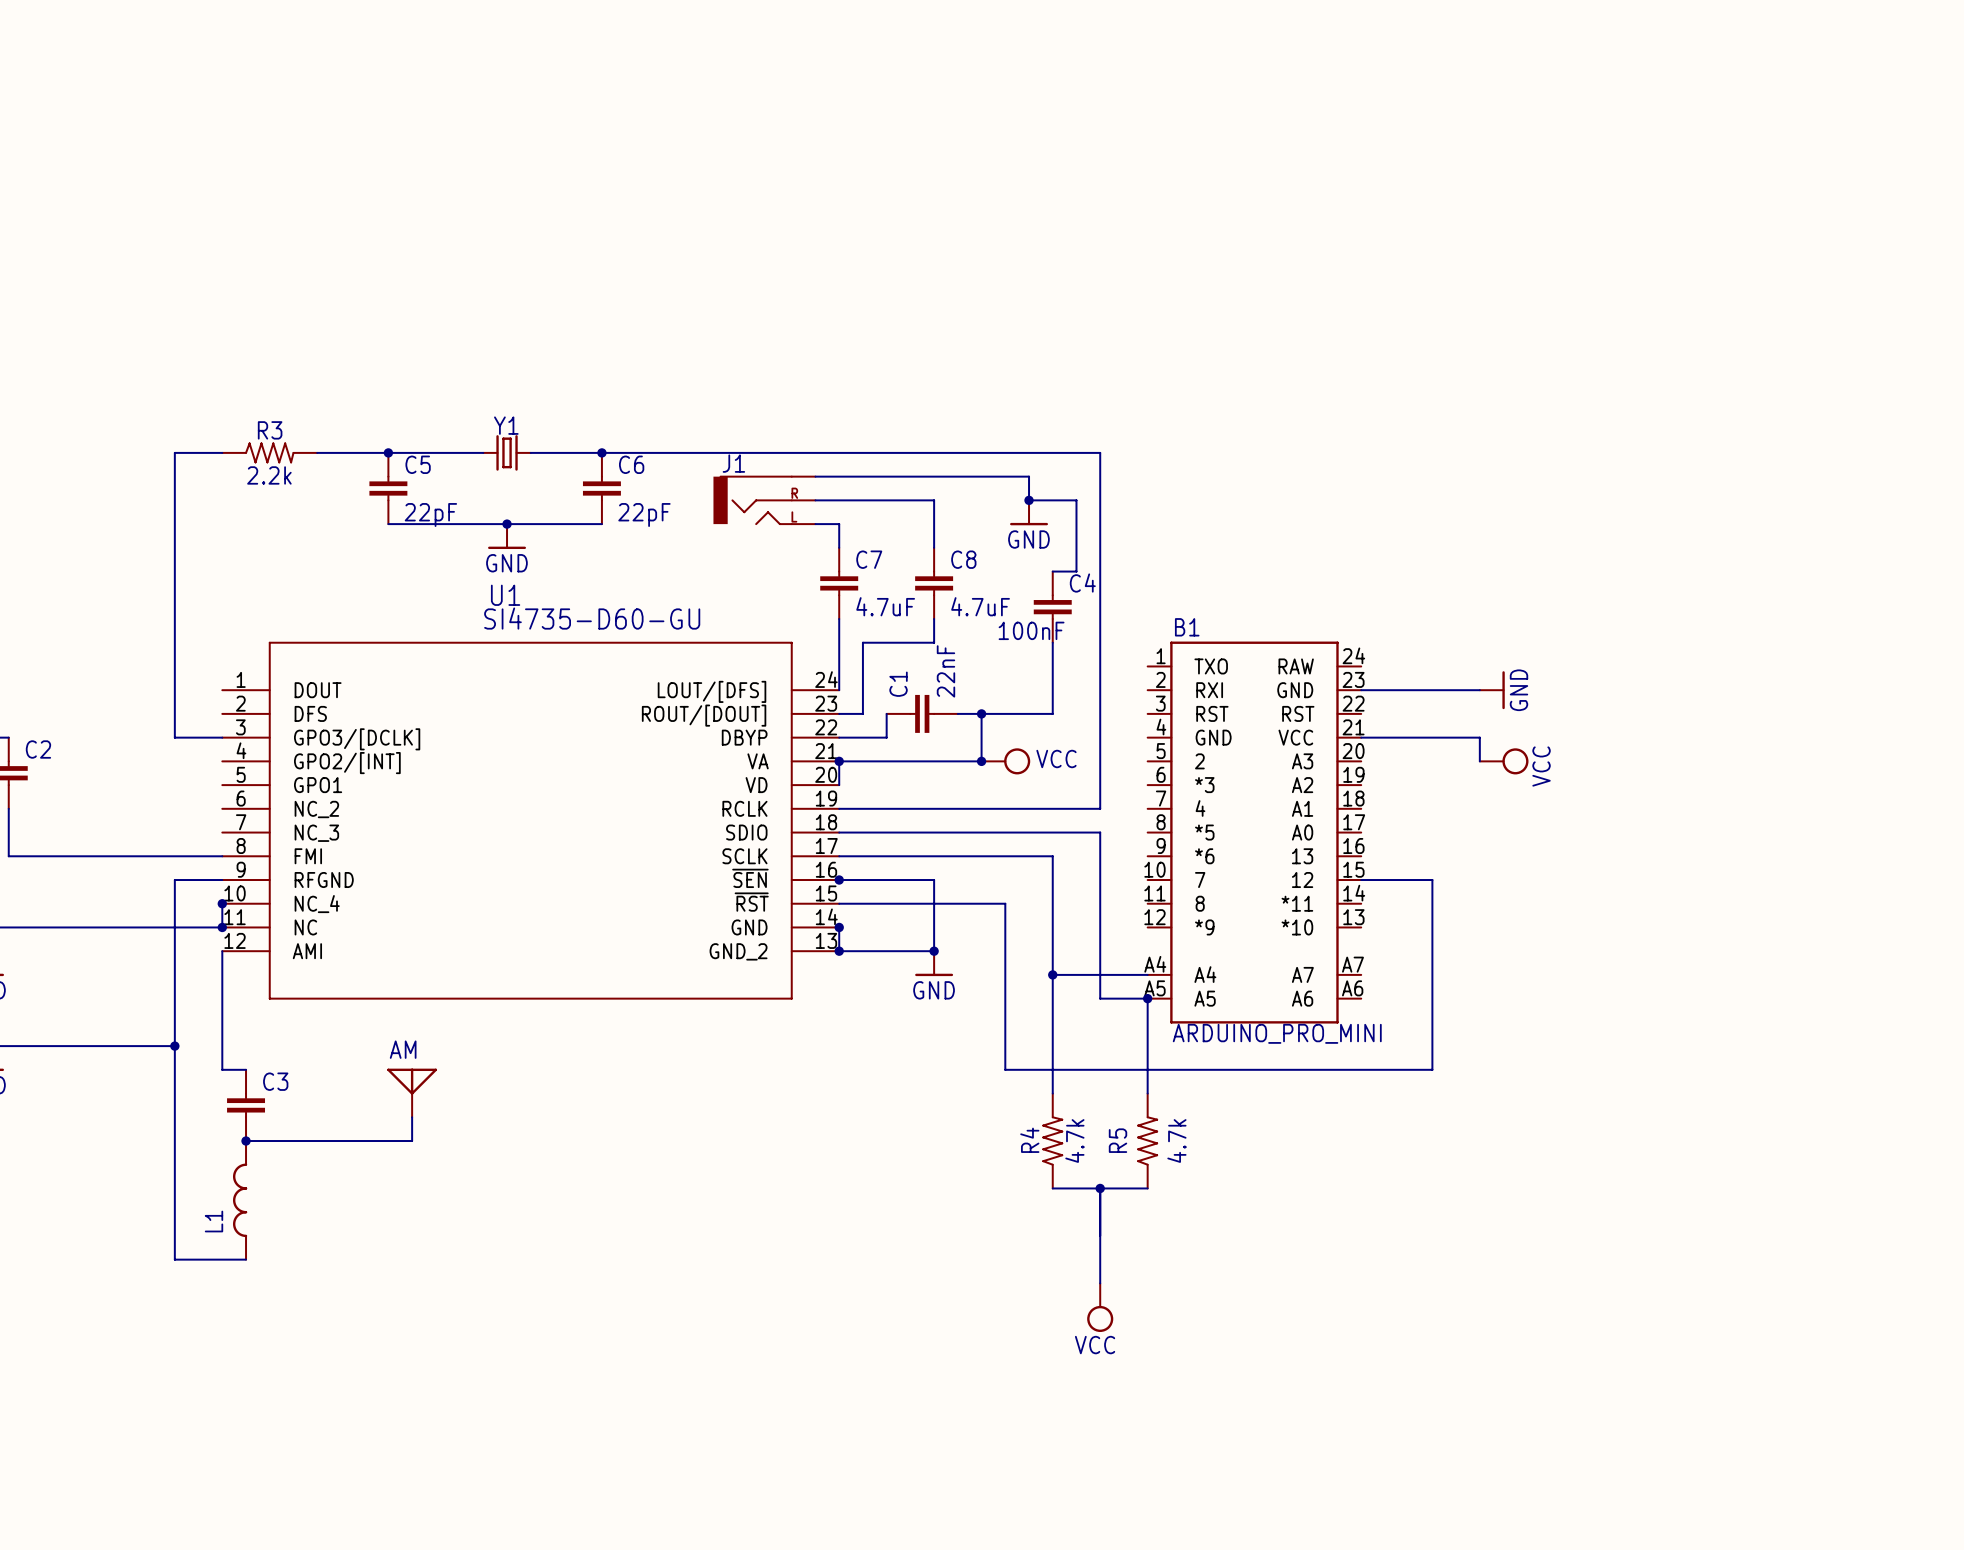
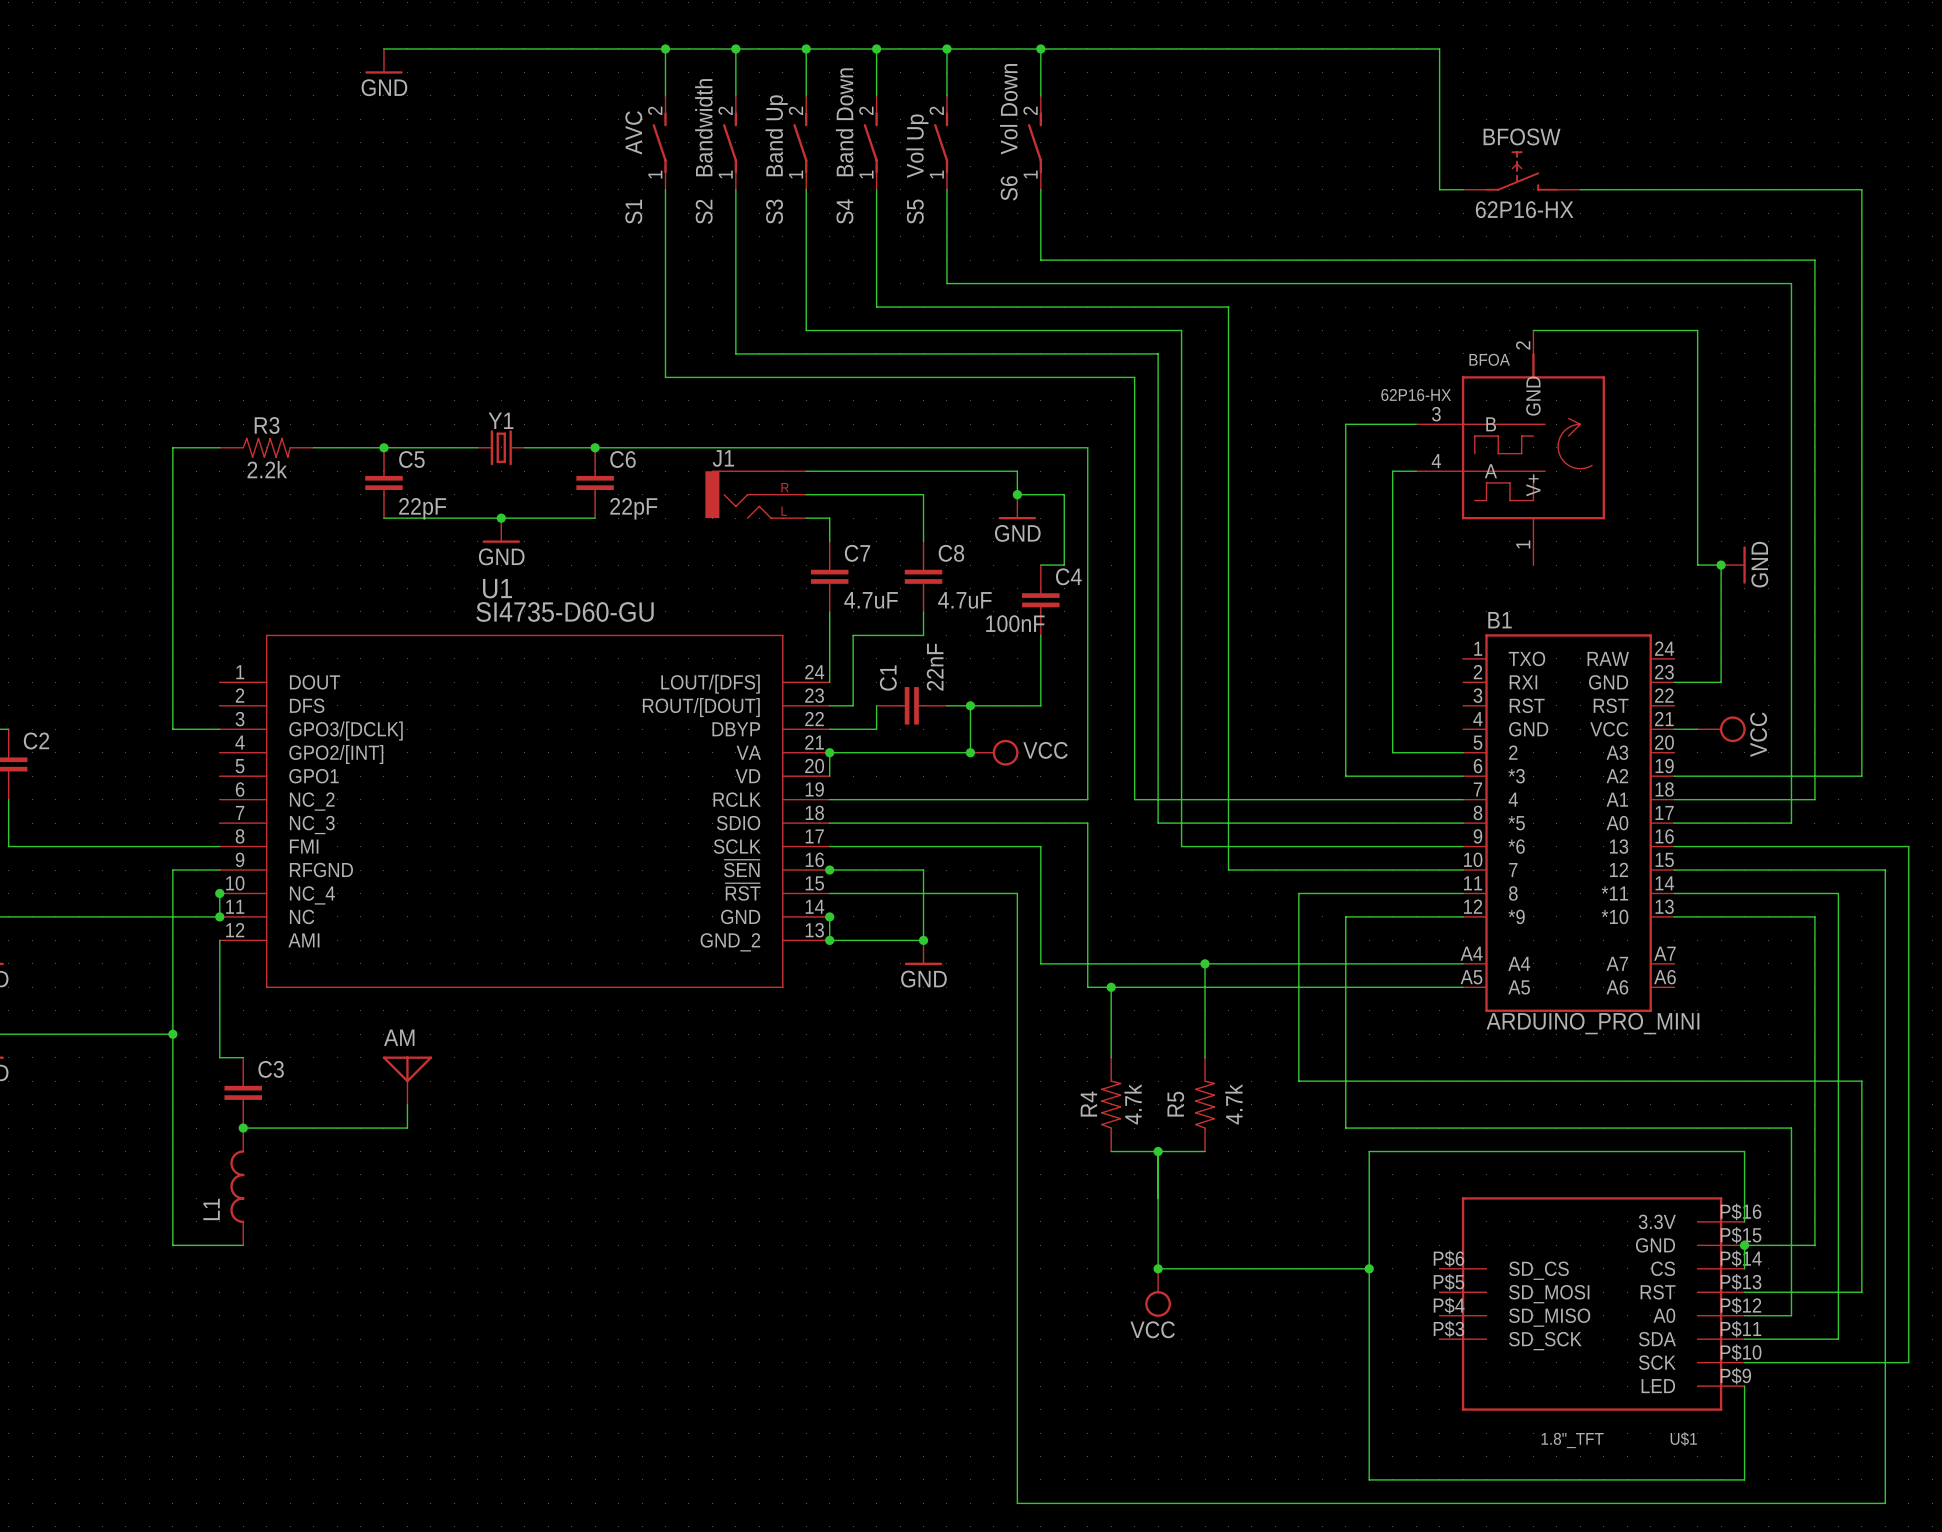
wire: none -> (383, 48) (1439, 48) (1439, 189) (1463, 189)
wire: none -> (665, 48) (665, 95)
junction: none -> (665, 48)
wire: none -> (735, 48) (735, 95)
junction: none -> (735, 48)
wire: none -> (806, 48) (806, 95)
junction: none -> (806, 48)
wire: none -> (876, 48) (876, 95)
junction: none -> (876, 48)
wire: none -> (946, 48) (946, 95)
junction: none -> (946, 48)
wire: none -> (1040, 48) (1040, 95)
junction: none -> (1040, 48)
power symbol: none -> GND (383, 61)
S1: none -> AVC (659, 142)
S2: none -> Bandwidth (729, 142)
S3: none -> Band Up (800, 142)
S4: none -> Band Down (870, 142)
S5: none -> Vol Up (941, 142)
S6: none -> Vol Down (1034, 142)
BFOSW: none -> 62P16-HX (1521, 170)
wire: none -> (665, 189) (665, 377) (1134, 377) (1134, 799) (1463, 799)
wire: none -> (735, 189) (735, 353) (1158, 353) (1158, 823) (1463, 823)
wire: none -> (806, 189) (806, 330) (1181, 330) (1181, 846) (1463, 846)
wire: none -> (876, 189) (876, 307) (1228, 307) (1228, 870) (1345, 870)
wire: none -> (946, 189) (946, 283) (1791, 283) (1791, 823) (1674, 823)
wire: none -> (1040, 189) (1040, 260) (1814, 260) (1814, 799) (1674, 799)
wire: none -> (1580, 189) (1861, 189) (1861, 776) (1674, 776)
wire: none -> (1533, 330) (1697, 330) (1697, 565) (1721, 565) (1721, 682) (1674, 682)
wire: none -> (1416, 424) (1345, 424) (1345, 776) (1463, 776)
BFOA: none -> 62P16-HX (1510, 447)
junction: none -> (1721, 565)
power symbol: none -> GND (1733, 565)
wire: (1361, 690) (1479, 690) -> none
power symbol: GND (1492, 690) -> none
wire: (1361, 737) (1479, 737) (1479, 761) -> (1416, 471) (1392, 471) (1392, 752) (1463, 752)
wire: none -> (1674, 729) (1697, 729)
power symbol: none -> VCC (1721, 729)
power symbol: VCC (1504, 761) -> none
B1 position: (1254, 832) -> (1568, 823)
wire: none -> (1674, 846) (1908, 846) (1908, 1362) (1744, 1362)
wire: (1432, 880) (1432, 1069) (1005, 1069) (1005, 903) -> (1674, 870) (1885, 870) (1885, 1503) (1017, 1503) (1017, 893) (993, 893)
wire: none -> (1416, 870) (1463, 870)
wire: none -> (1463, 893) (1298, 893) (1298, 1081) (1861, 1081) (1861, 1292) (1744, 1292)
wire: none -> (1674, 893) (1838, 893) (1838, 1339) (1744, 1339)
wire: none -> (1463, 916) (1345, 916) (1345, 1128) (1791, 1128) (1791, 1315) (1744, 1315)
wire: none -> (1674, 916) (1814, 916) (1814, 1245) (1744, 1245) (1744, 1268)
wire: (1052, 974) (1052, 1093) -> none
junction: (1052, 974) -> none
wire: none -> (1134, 963) (1463, 963)
wire: none -> (1205, 963) (1205, 1057)
junction: none -> (1205, 963)
wire: none -> (1111, 987) (1111, 1057)
wire: (1147, 998) (1147, 1093) -> (1134, 987) (1463, 987)
junction position: (1147, 998) -> (1111, 987)
R4 position: (1052, 1141) -> (1111, 1104)
R5 position: (1147, 1141) -> (1205, 1104)
wire: none -> (1158, 1151) (1158, 1268) (1369, 1268)
junction: none -> (1158, 1151)
wire: (1052, 1188) (1147, 1188) -> (1111, 1151) (1205, 1151)
wire: (1100, 1188) (1100, 1283) -> none
junction: (1100, 1188) -> none
wire: none -> (1744, 1221) (1744, 1151) (1369, 1151) (1369, 1479) (1744, 1479) (1744, 1386)
junction: none -> (1744, 1245)
junction: none -> (1158, 1268)
junction: none -> (1369, 1268)
power symbol position: VCC (1100, 1307) -> VCC (1158, 1292)
U$1: none -> 1.8"_TFT (1592, 1304)

